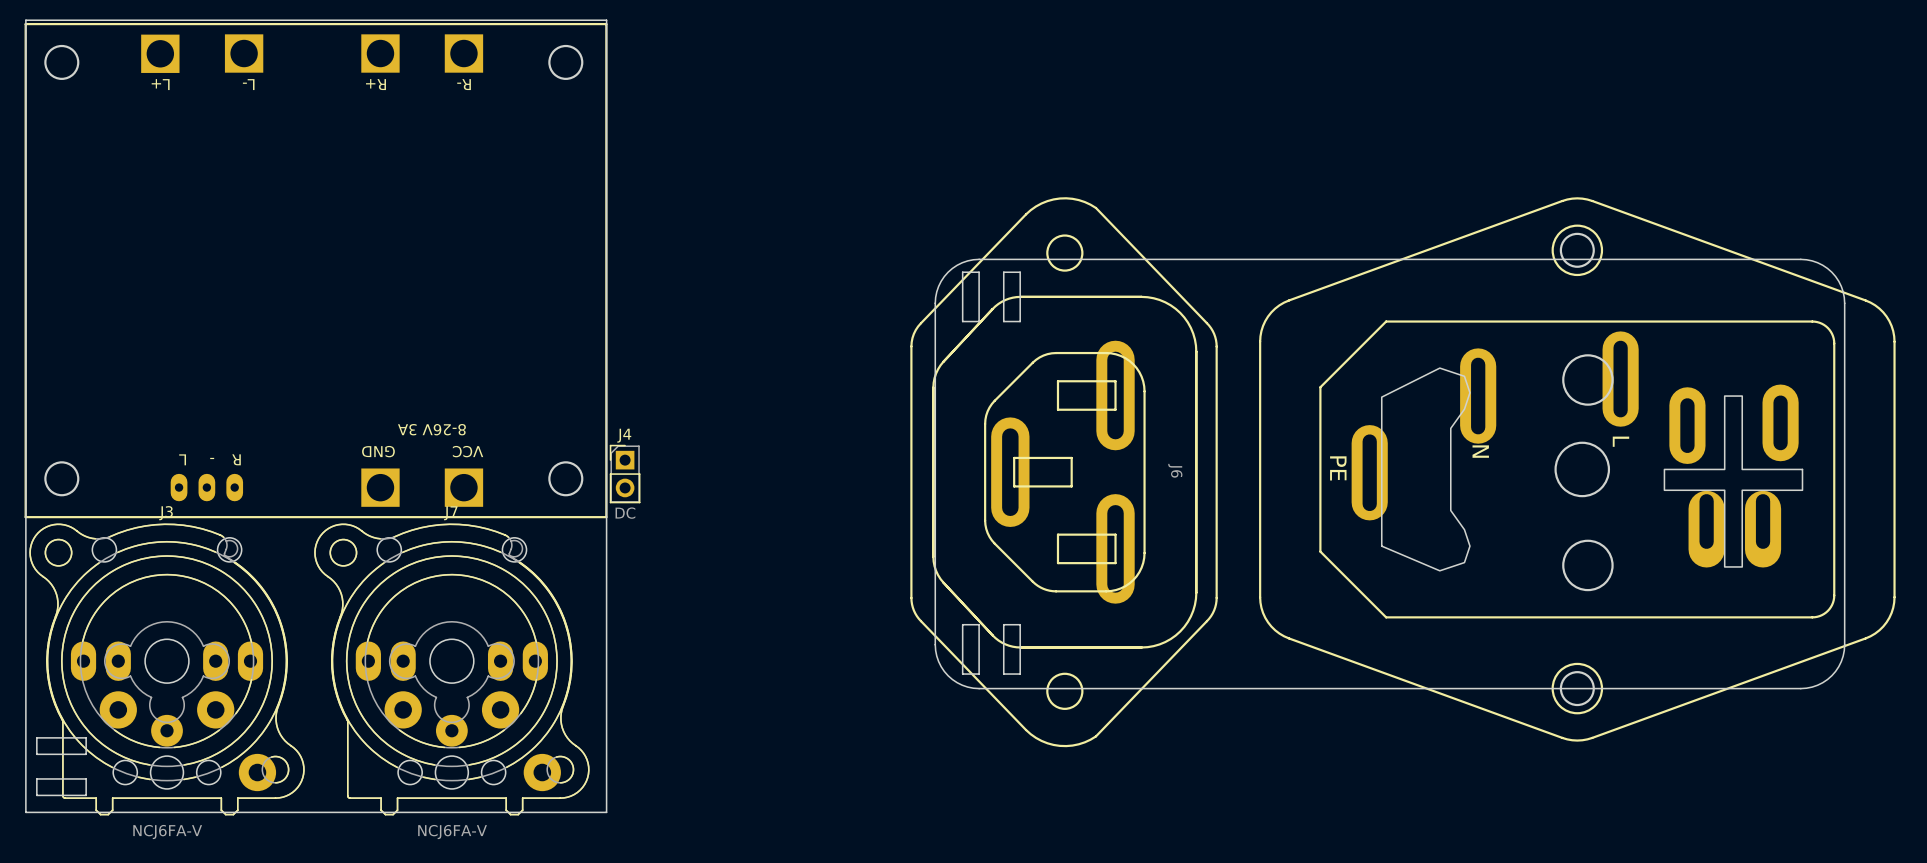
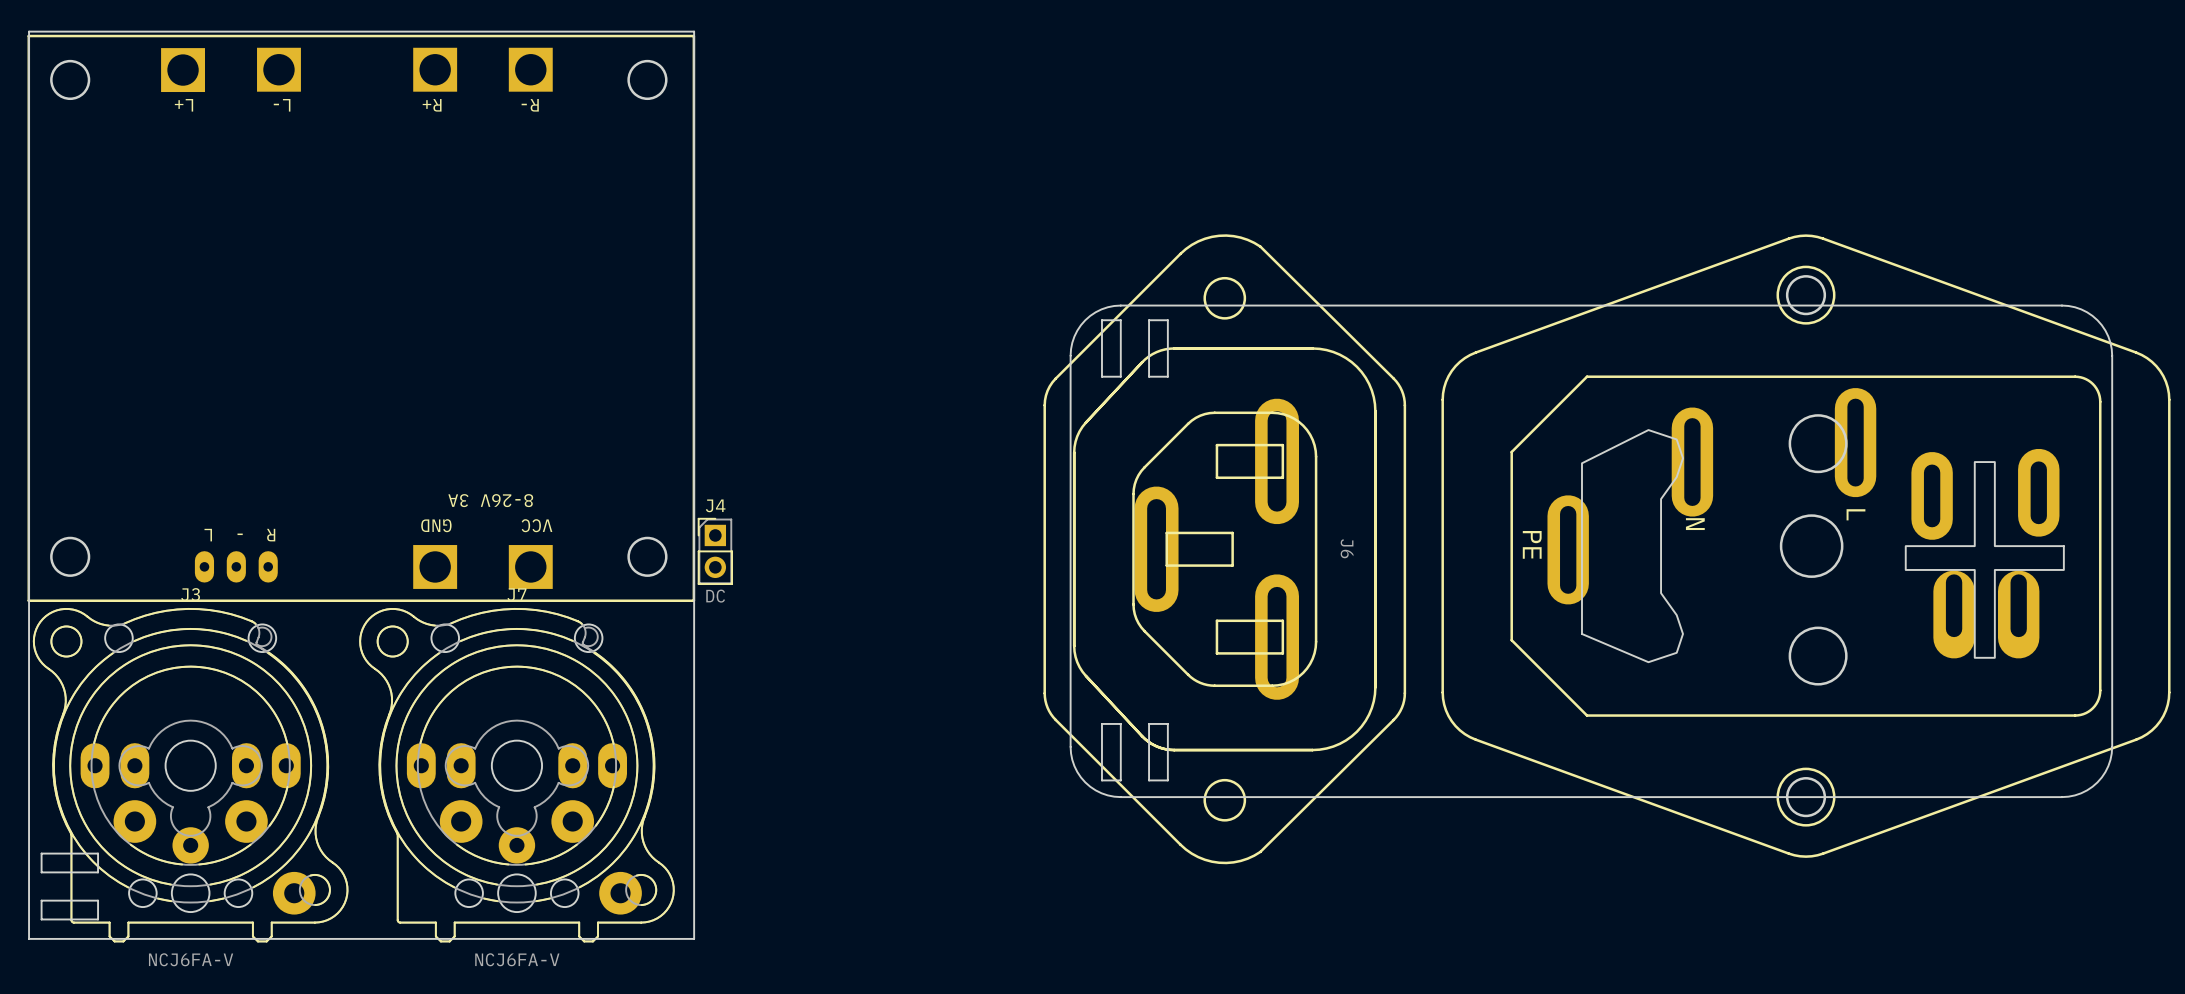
J6 footprint: [910, 197, 1218, 748] -> [1043, 234, 1407, 865]

